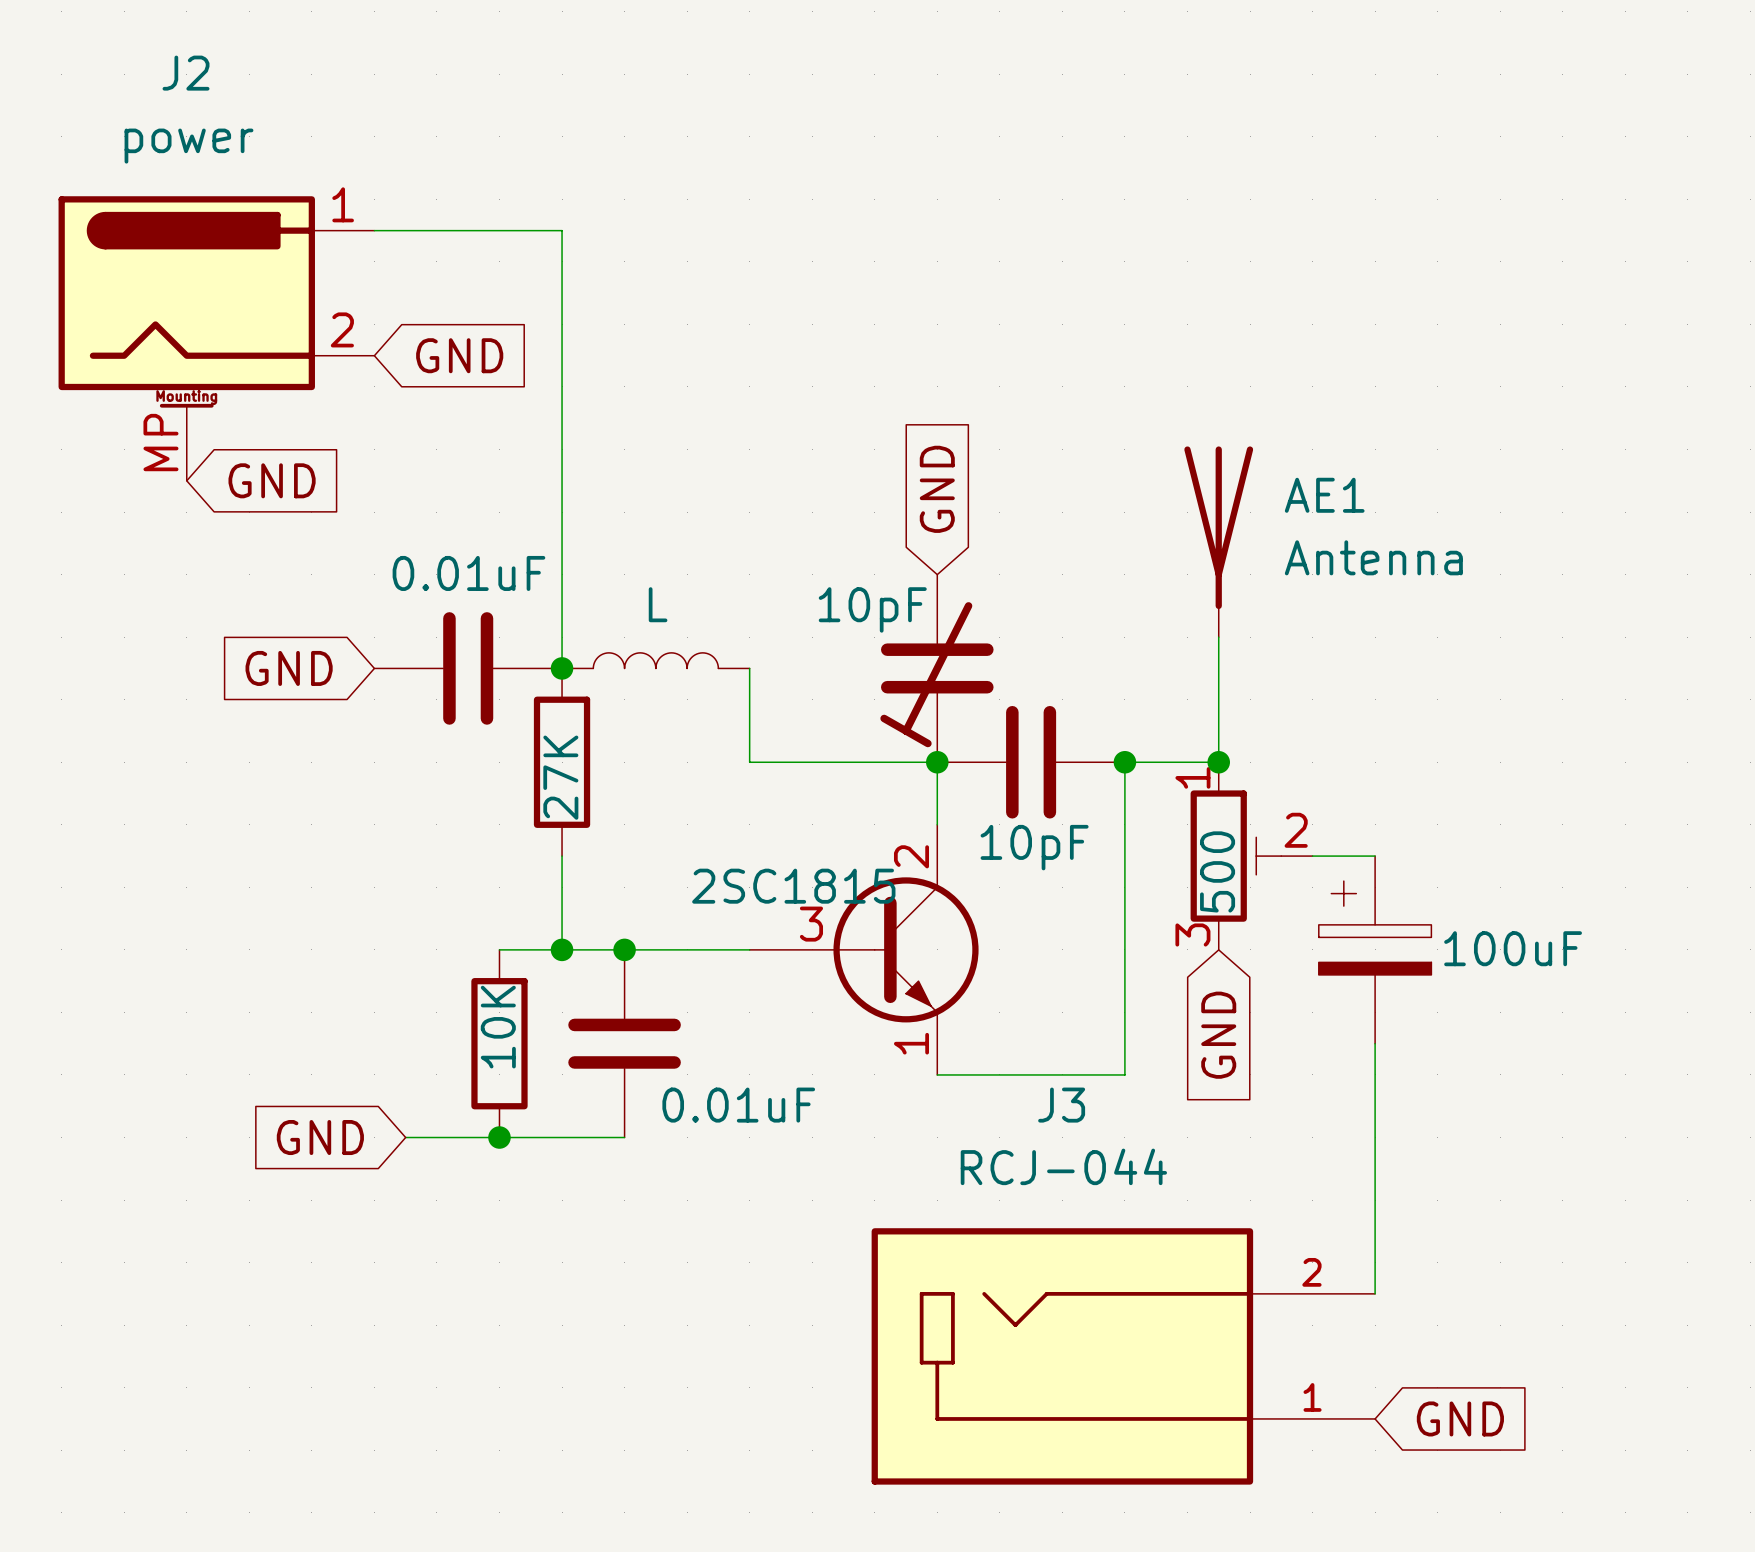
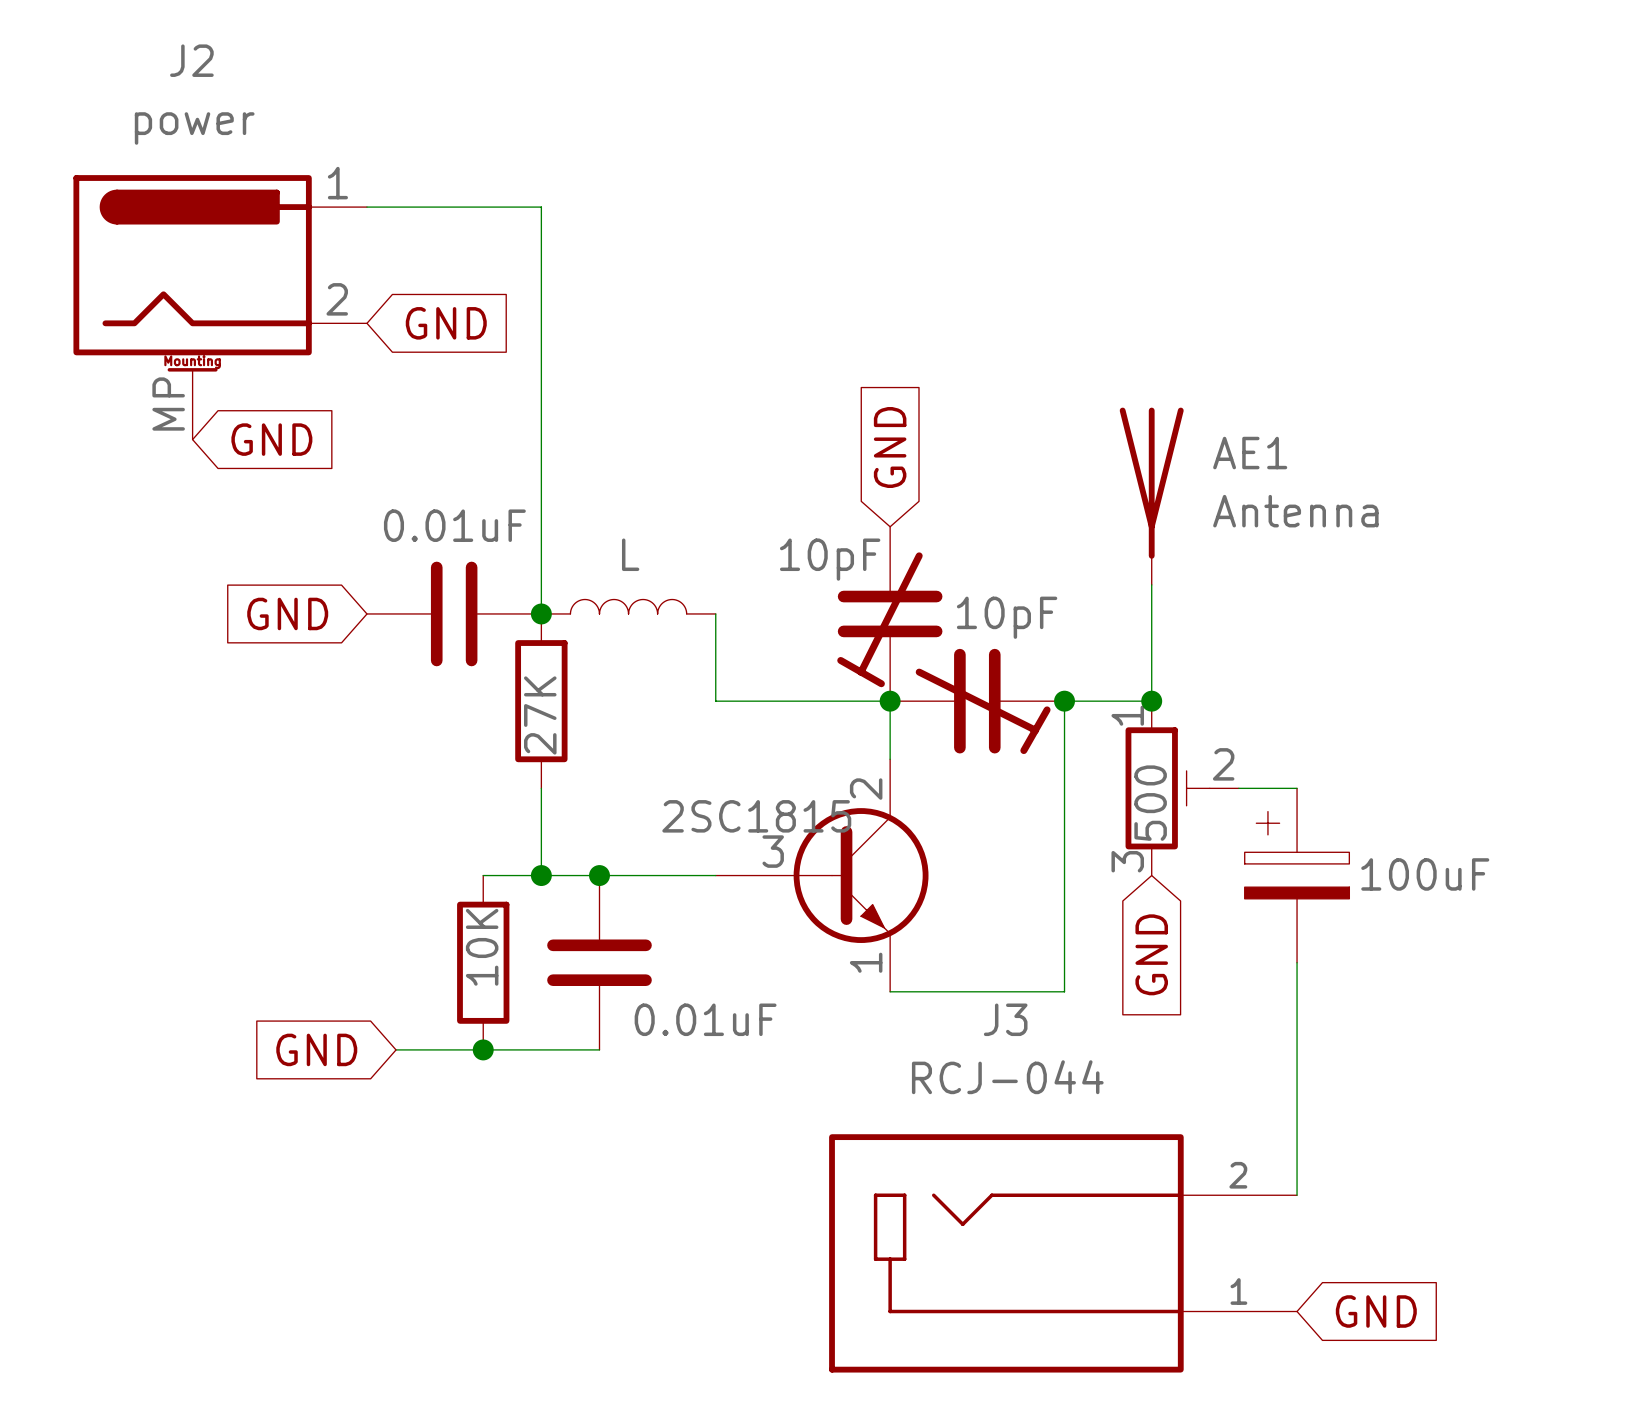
part symbol: [937, 705, 1125, 819] -> [890, 648, 1065, 755]
part value position: 10pF (1034, 847) -> 10pF (1007, 617)

